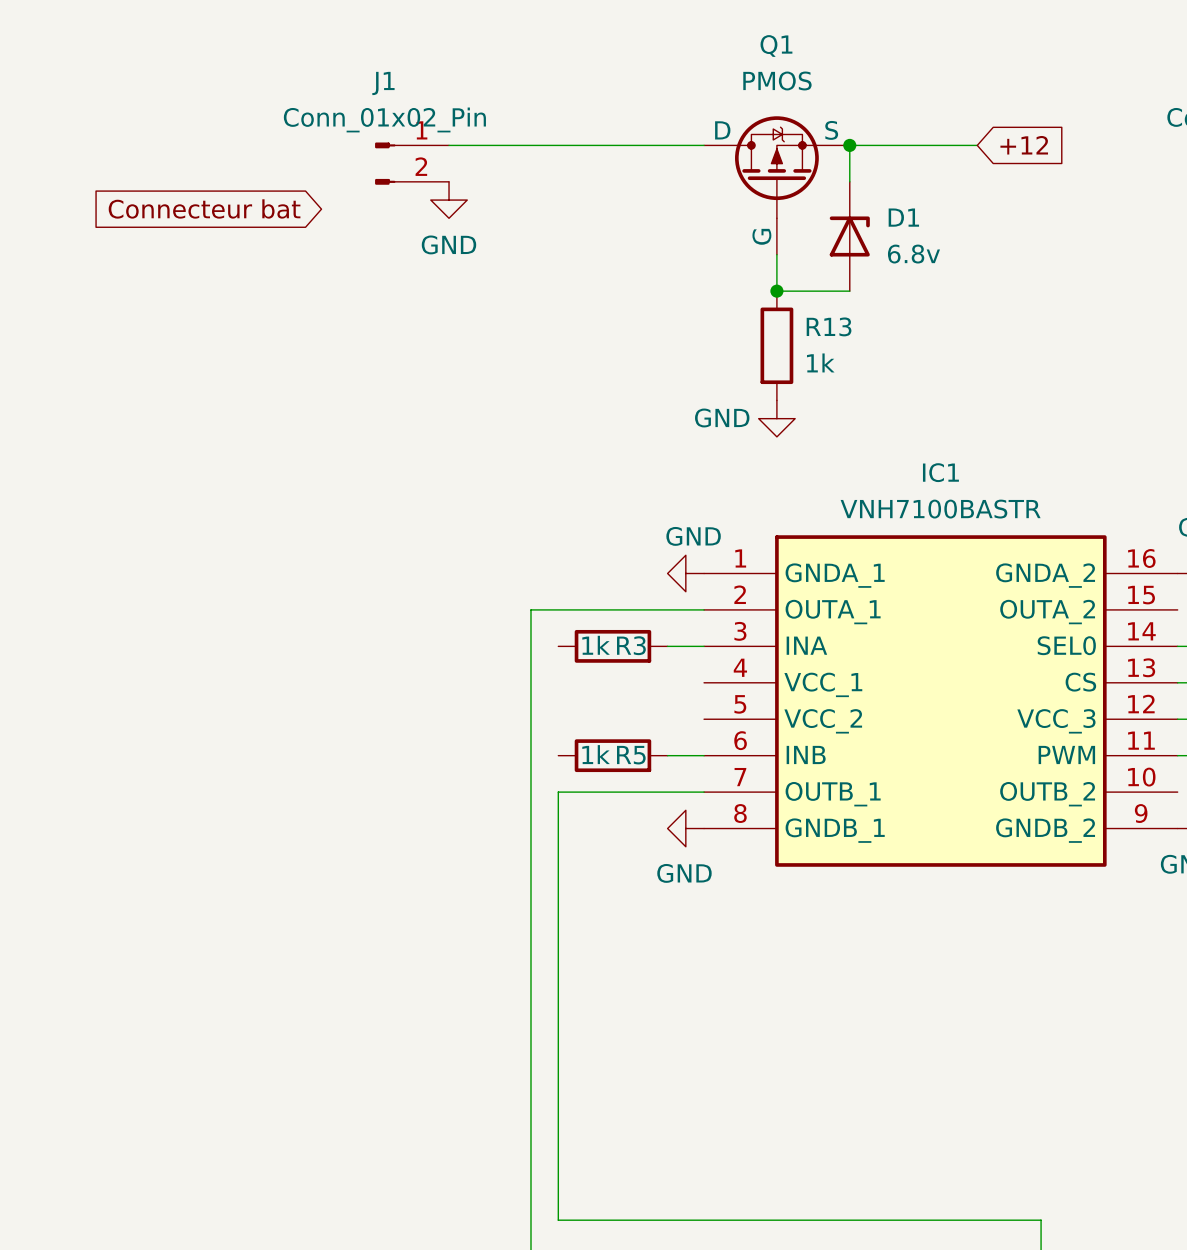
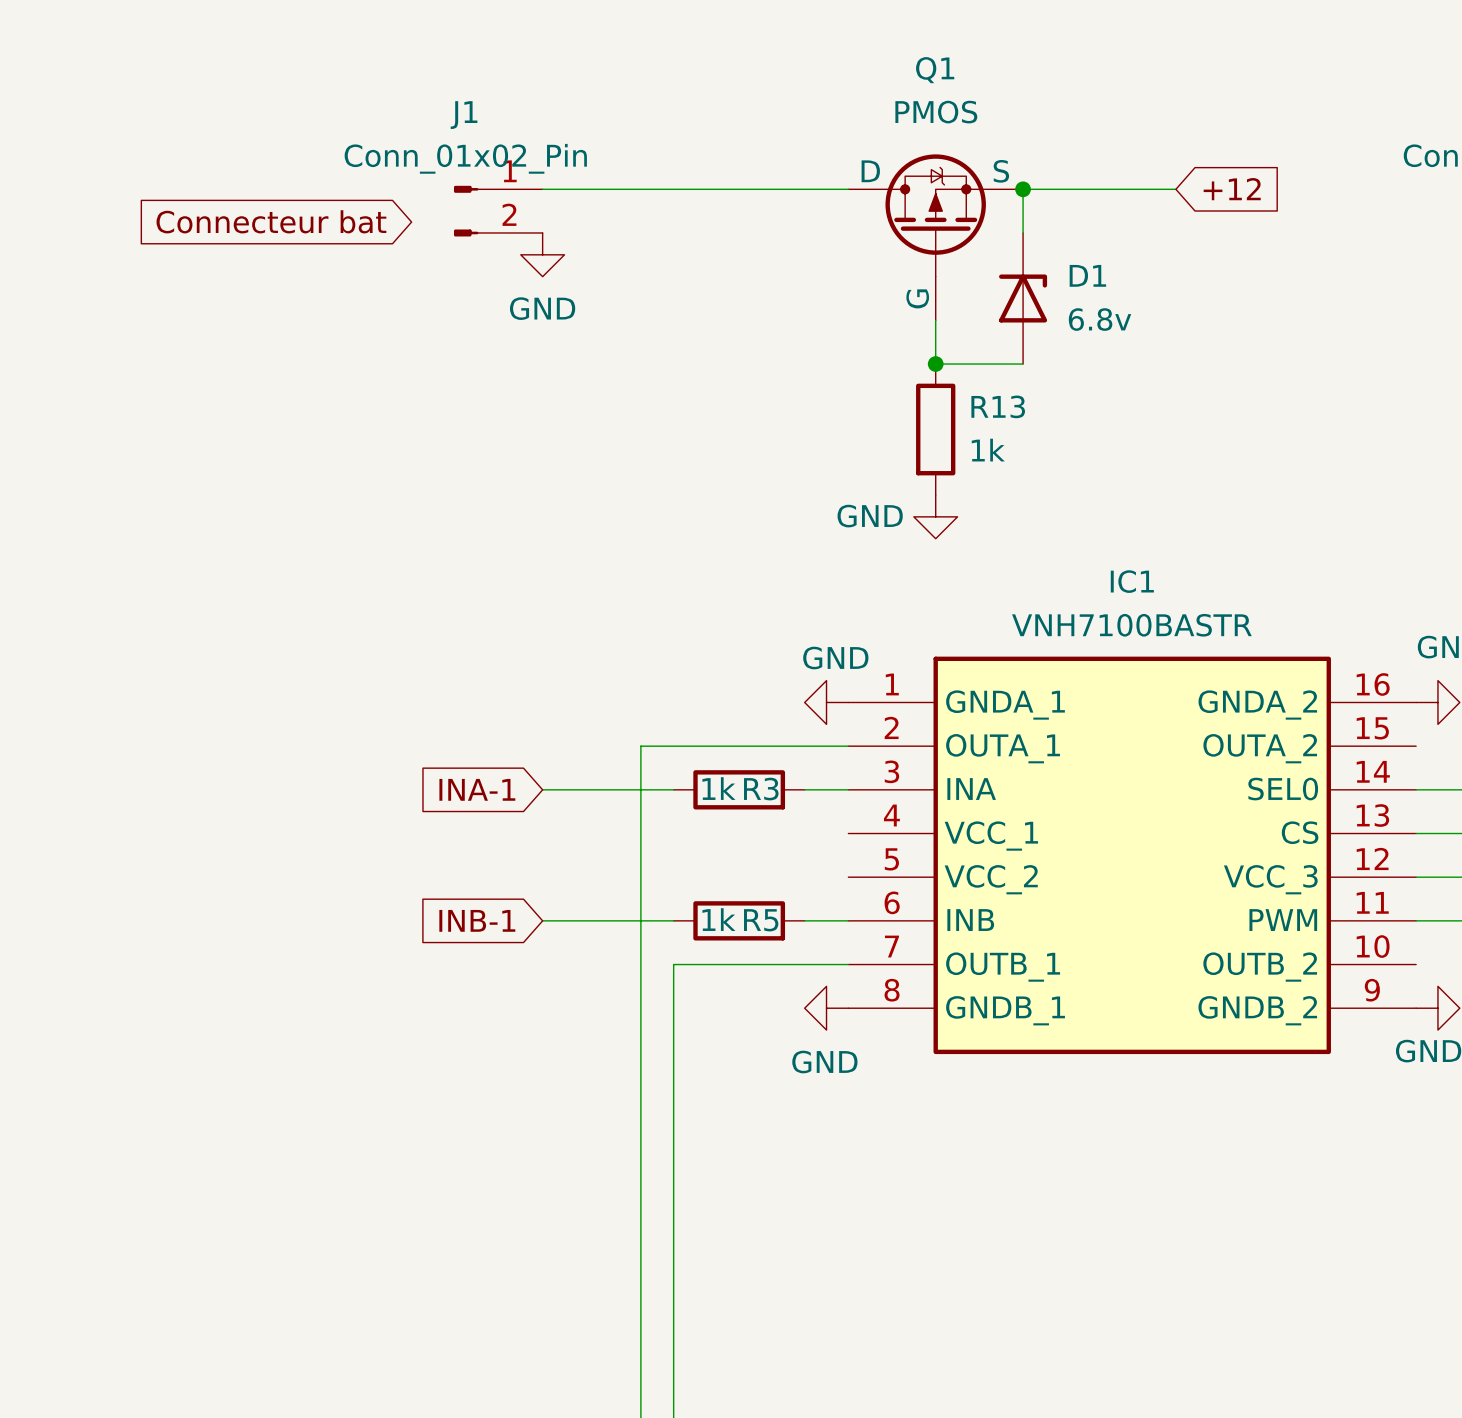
global label position: Connecteur bat (204, 208) -> Connecteur bat (271, 221)
global label: none -> INA-1 (477, 789)
wire: none -> (542, 789) (673, 789)
global label: none -> INB-1 (477, 920)
wire: none -> (542, 920) (673, 920)

